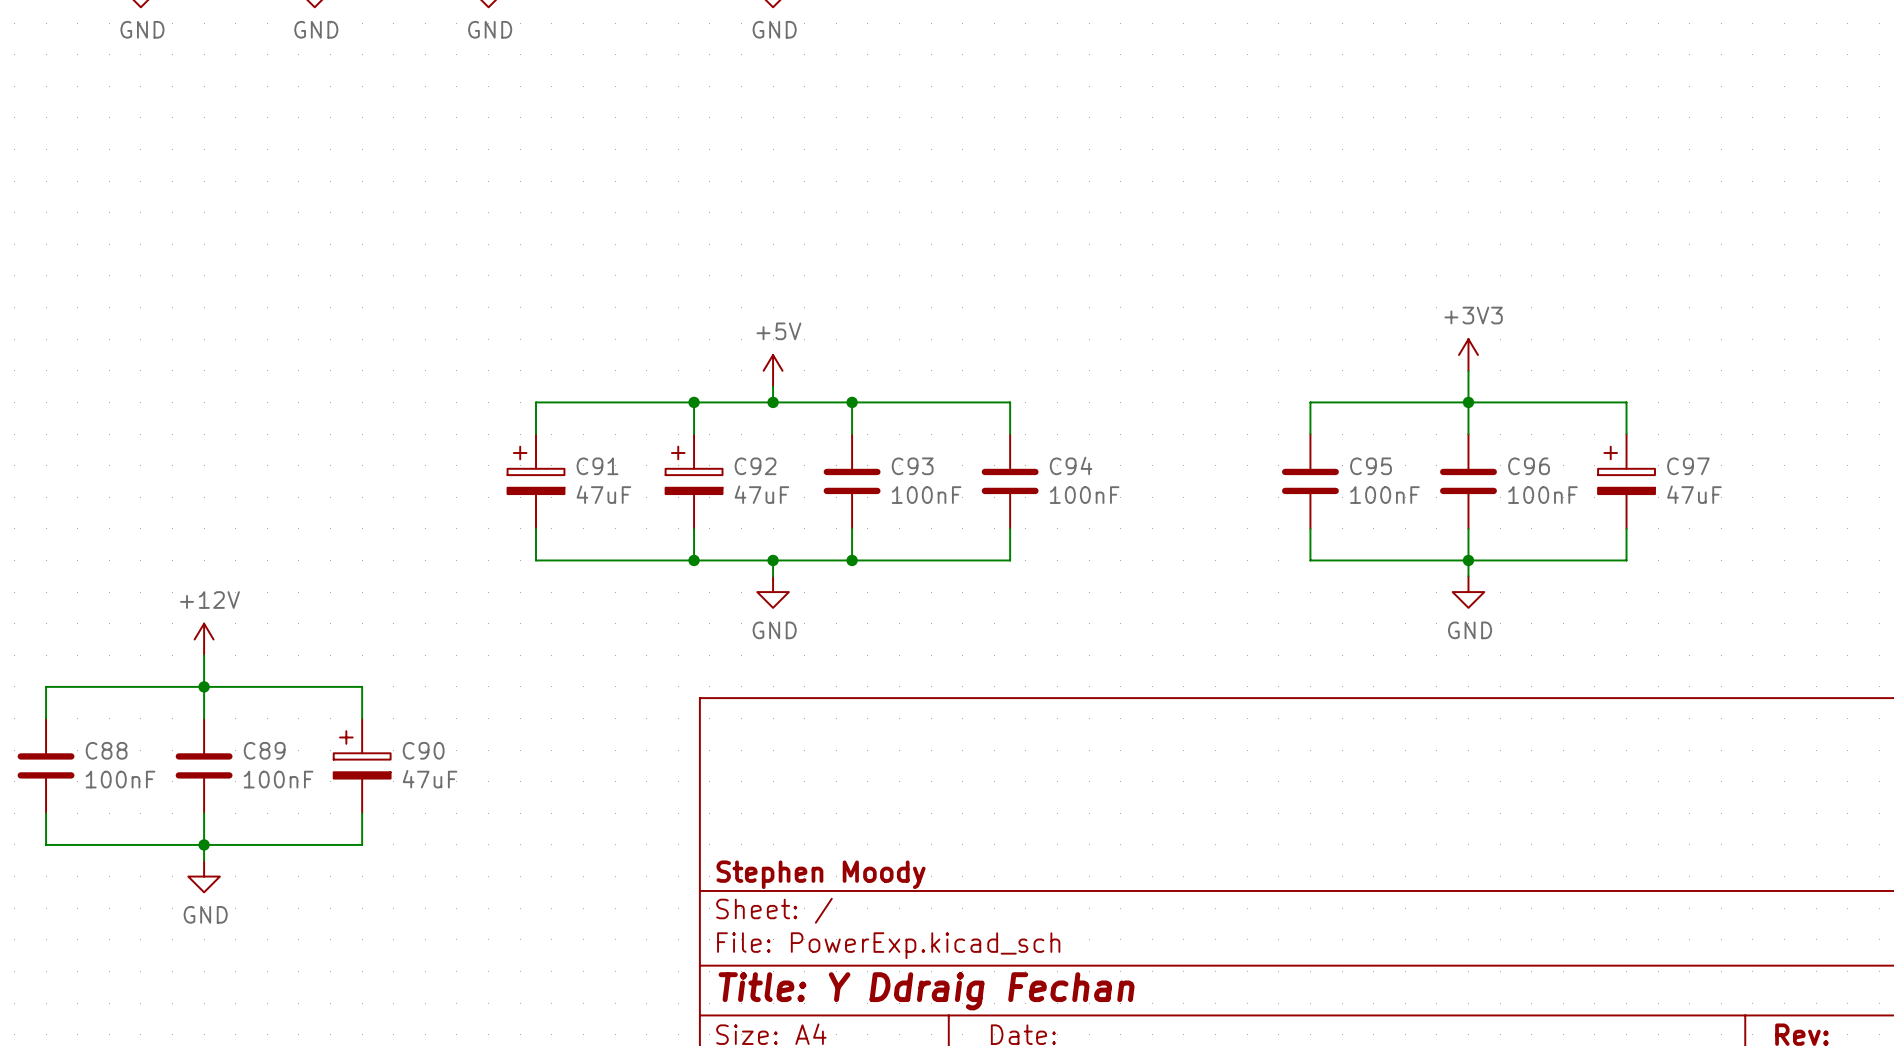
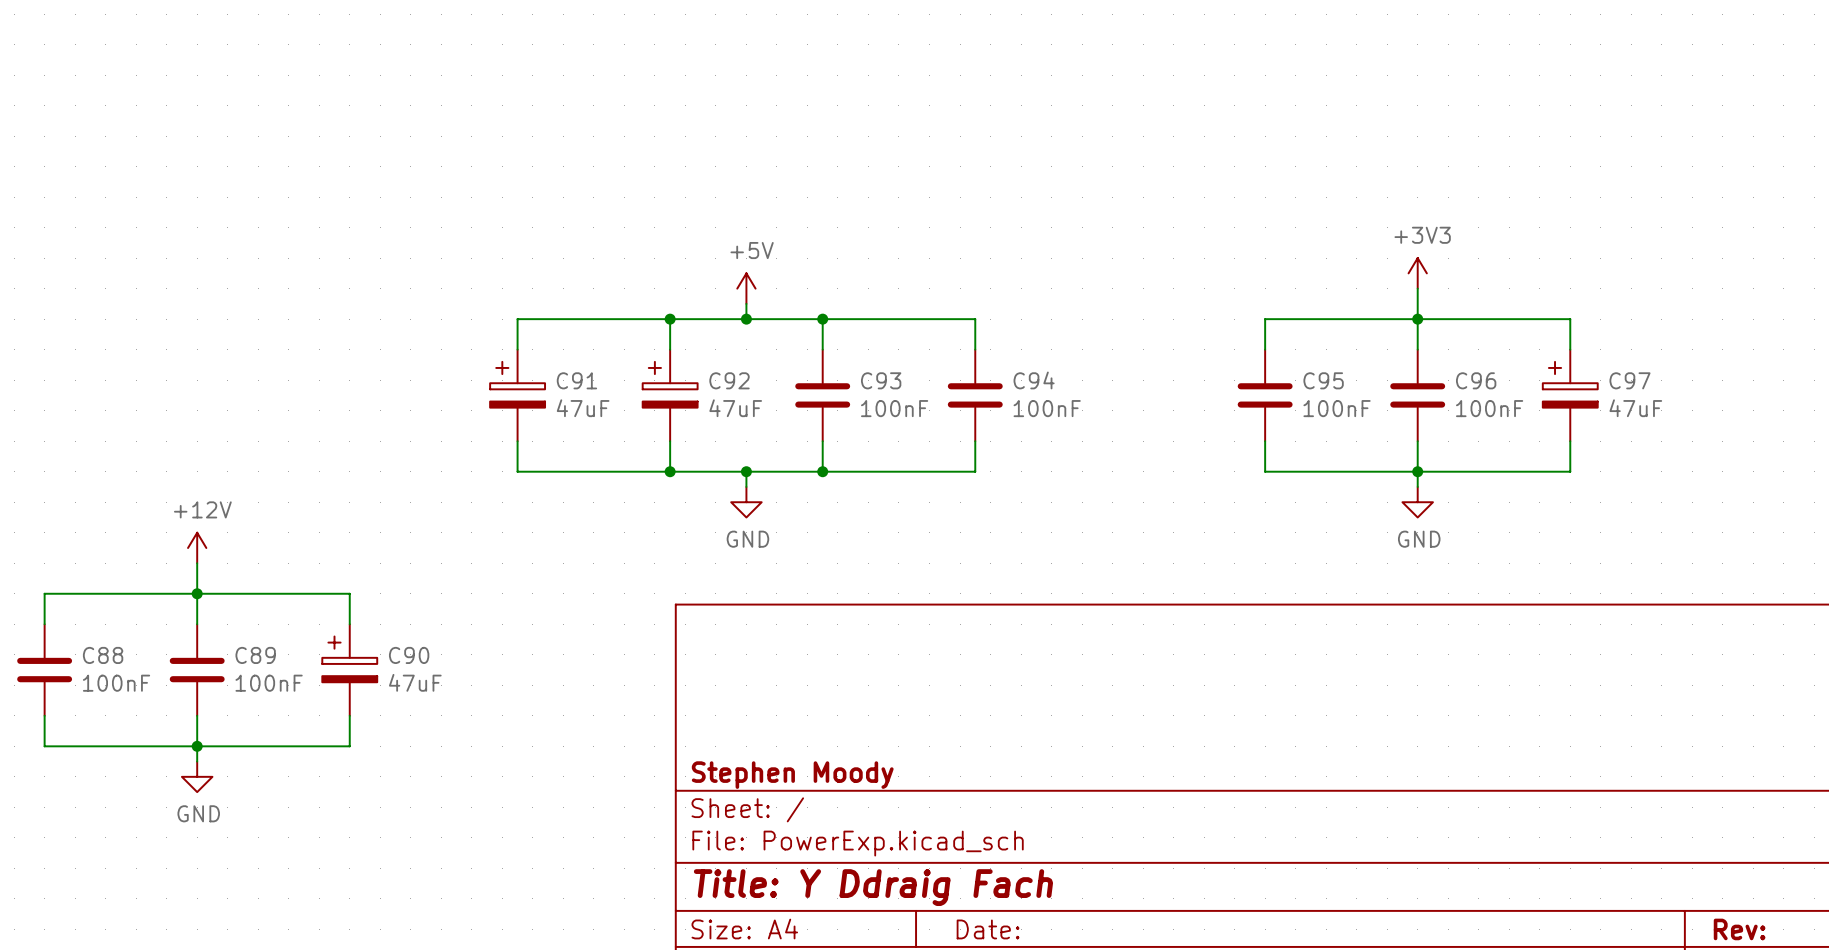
title block: Title: Y Ddraig Fechan (926, 991) -> Title: Y Ddraig Fach (873, 887)

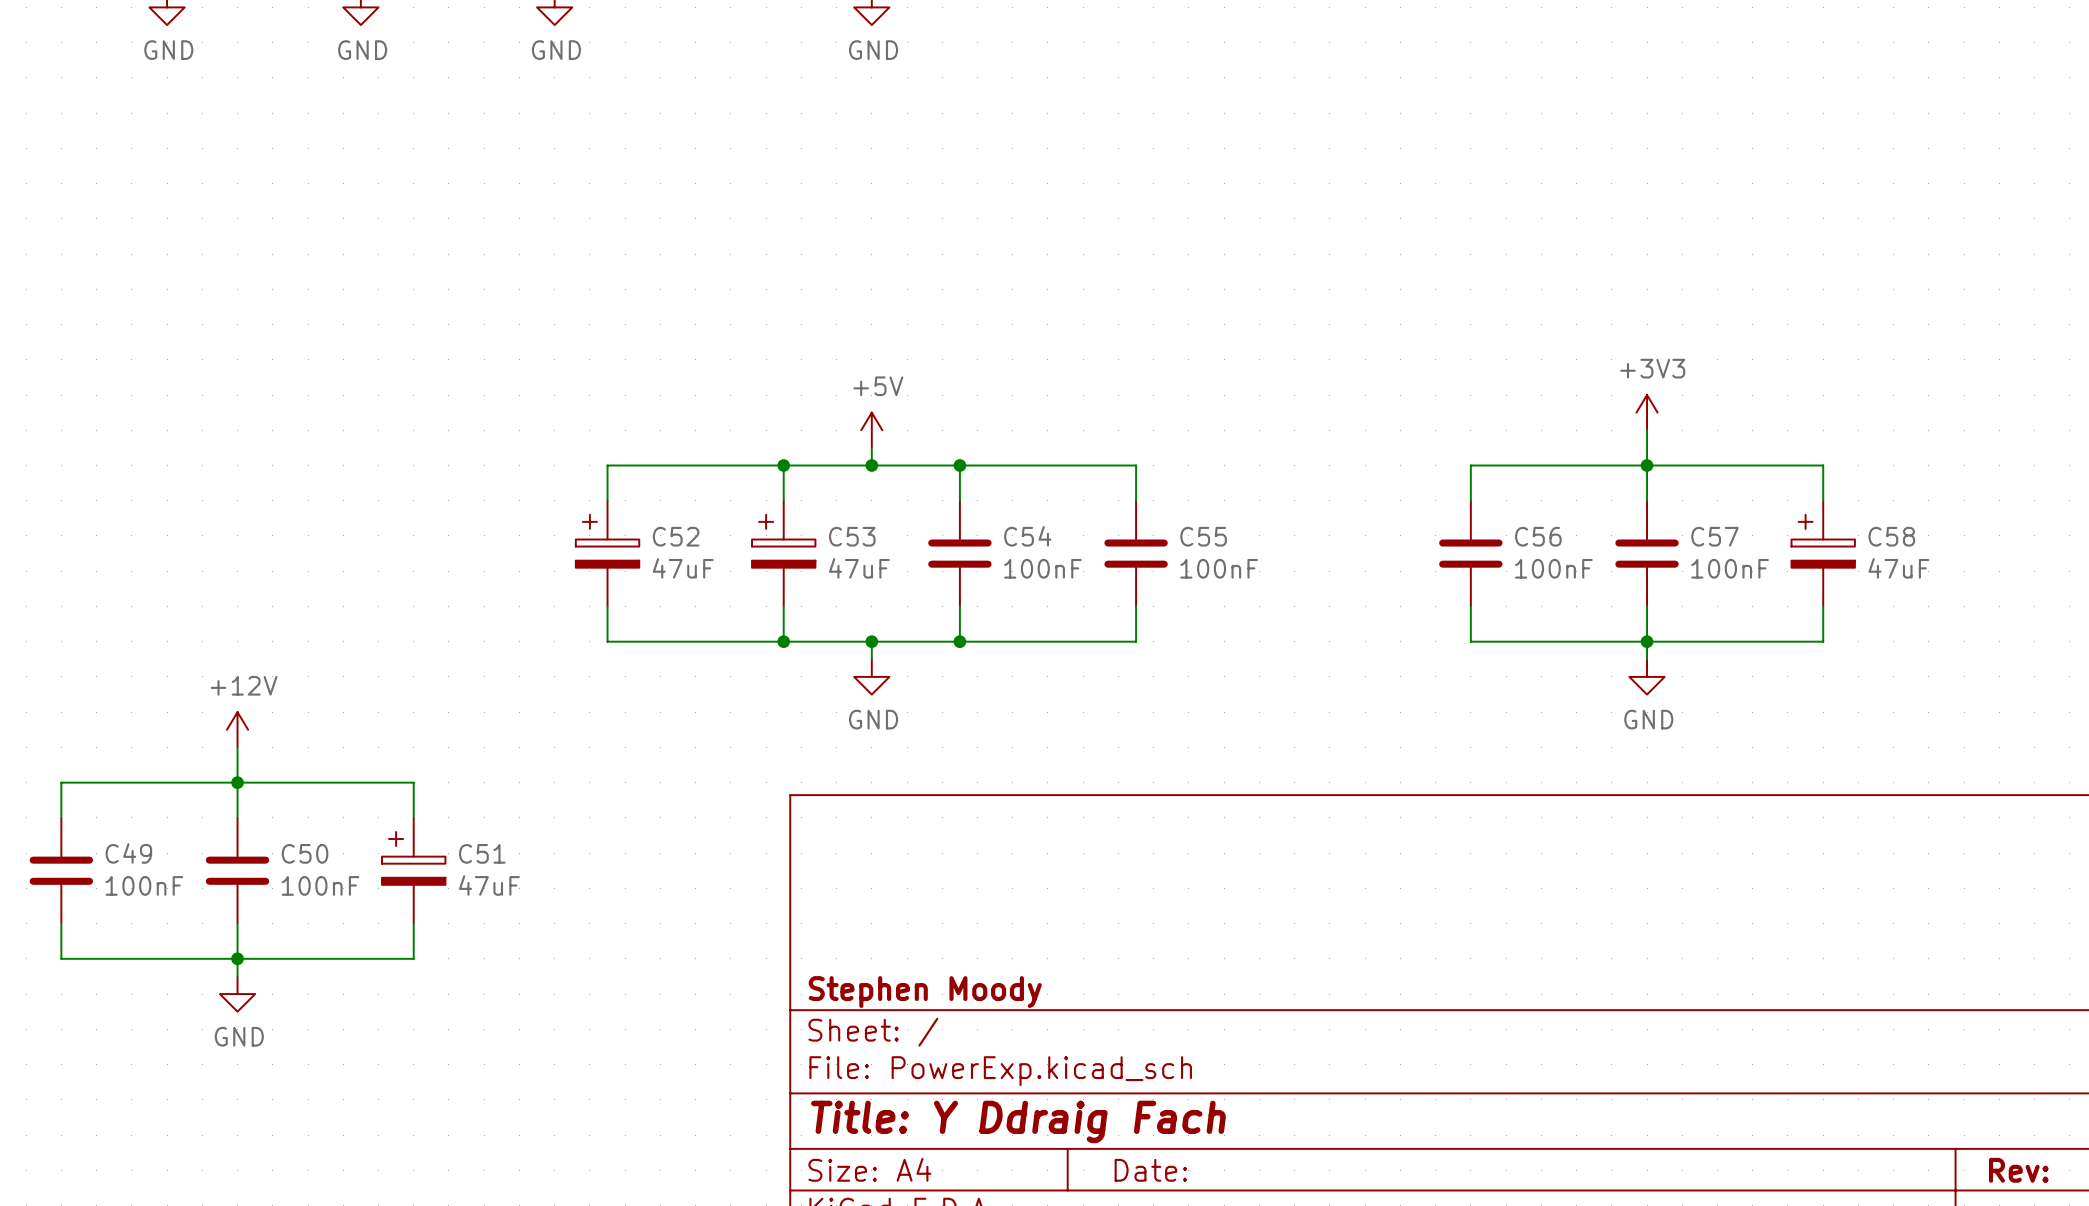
C91 name: C91 (576, 380) -> C52 (676, 536)
C92 name: C92 (729, 380) -> C53 (852, 536)
C93 name: C93 (881, 380) -> C54 (1027, 536)
C94 name: C94 (1034, 380) -> C55 (1203, 536)
C95 name: C95 (1323, 380) -> C56 (1538, 536)
C96 name: C96 (1476, 380) -> C57 (1714, 536)
C97 name: C97 (1630, 380) -> C58 (1891, 536)
C88 name: C88 (103, 655) -> C49 (128, 853)
C89 name: C89 (255, 655) -> C50 (305, 853)
C90 name: C90 (409, 655) -> C51 (482, 853)

